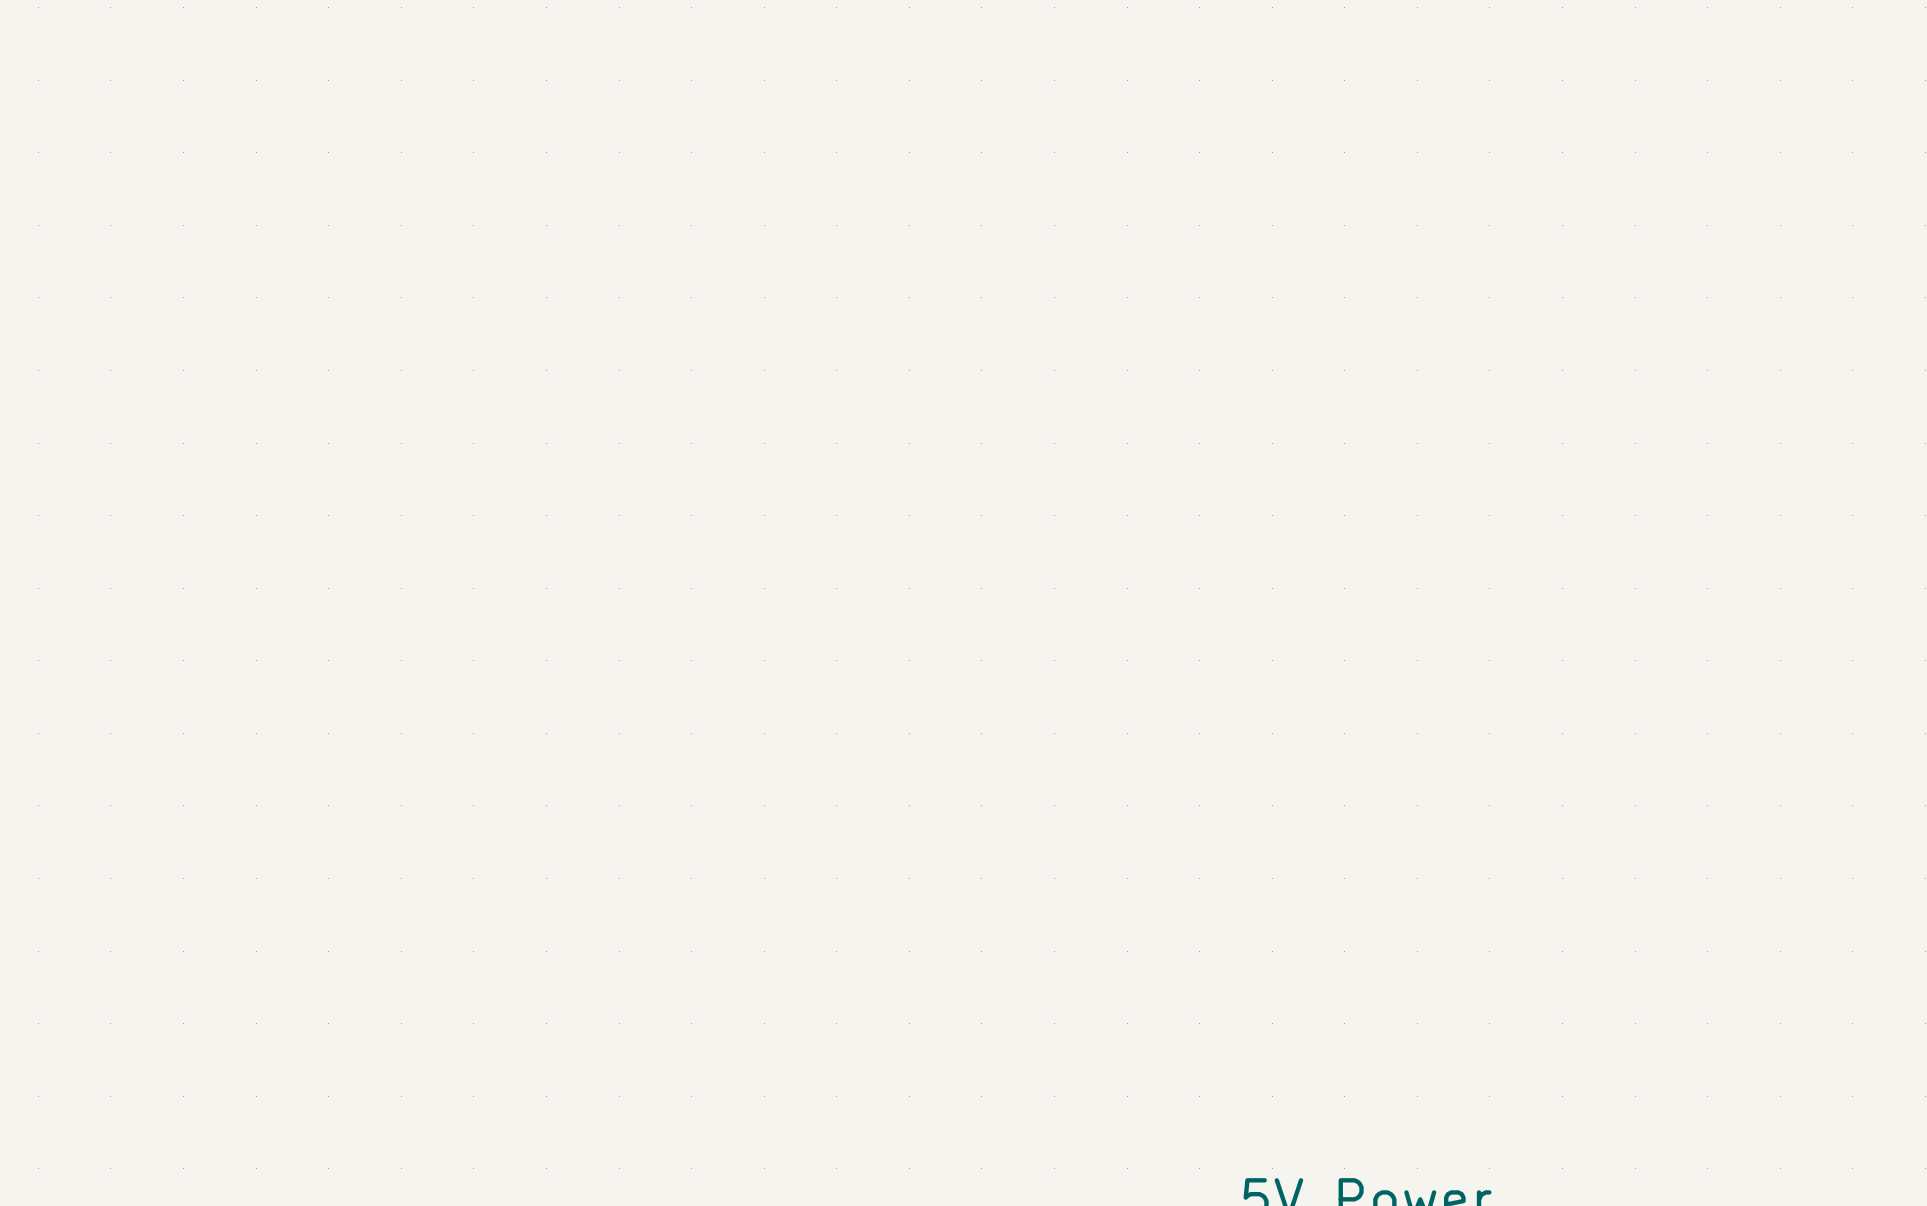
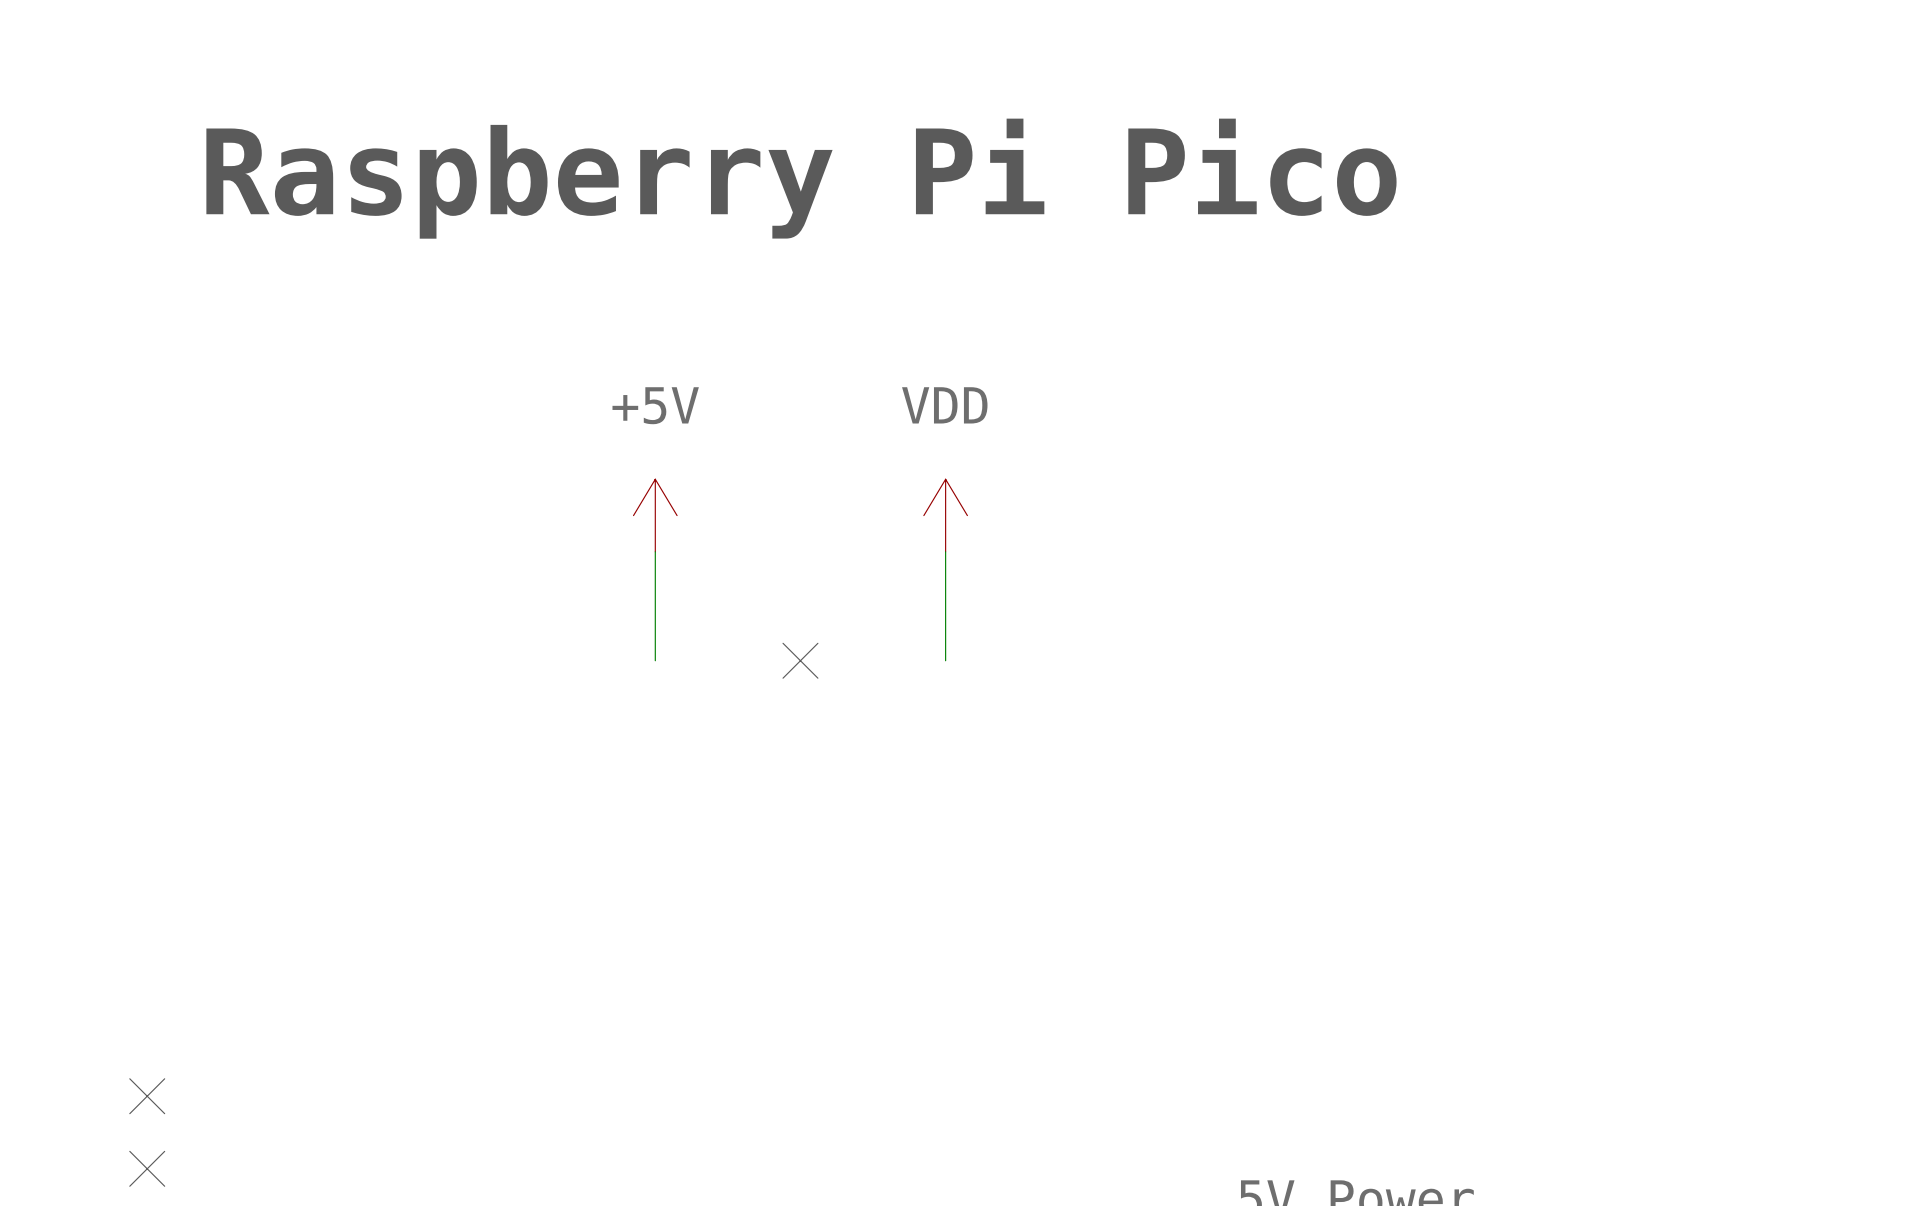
text: none -> Raspberry Pi Pico (801, 178)
power symbol: none -> +5V (655, 515)
power symbol: none -> VDD (945, 515)
wire: none -> (655, 551) (655, 660)
wire: none -> (945, 551) (945, 660)
no-connect mark: none -> (800, 660)
no-connect mark: none -> (147, 1096)
no-connect mark: none -> (147, 1168)

